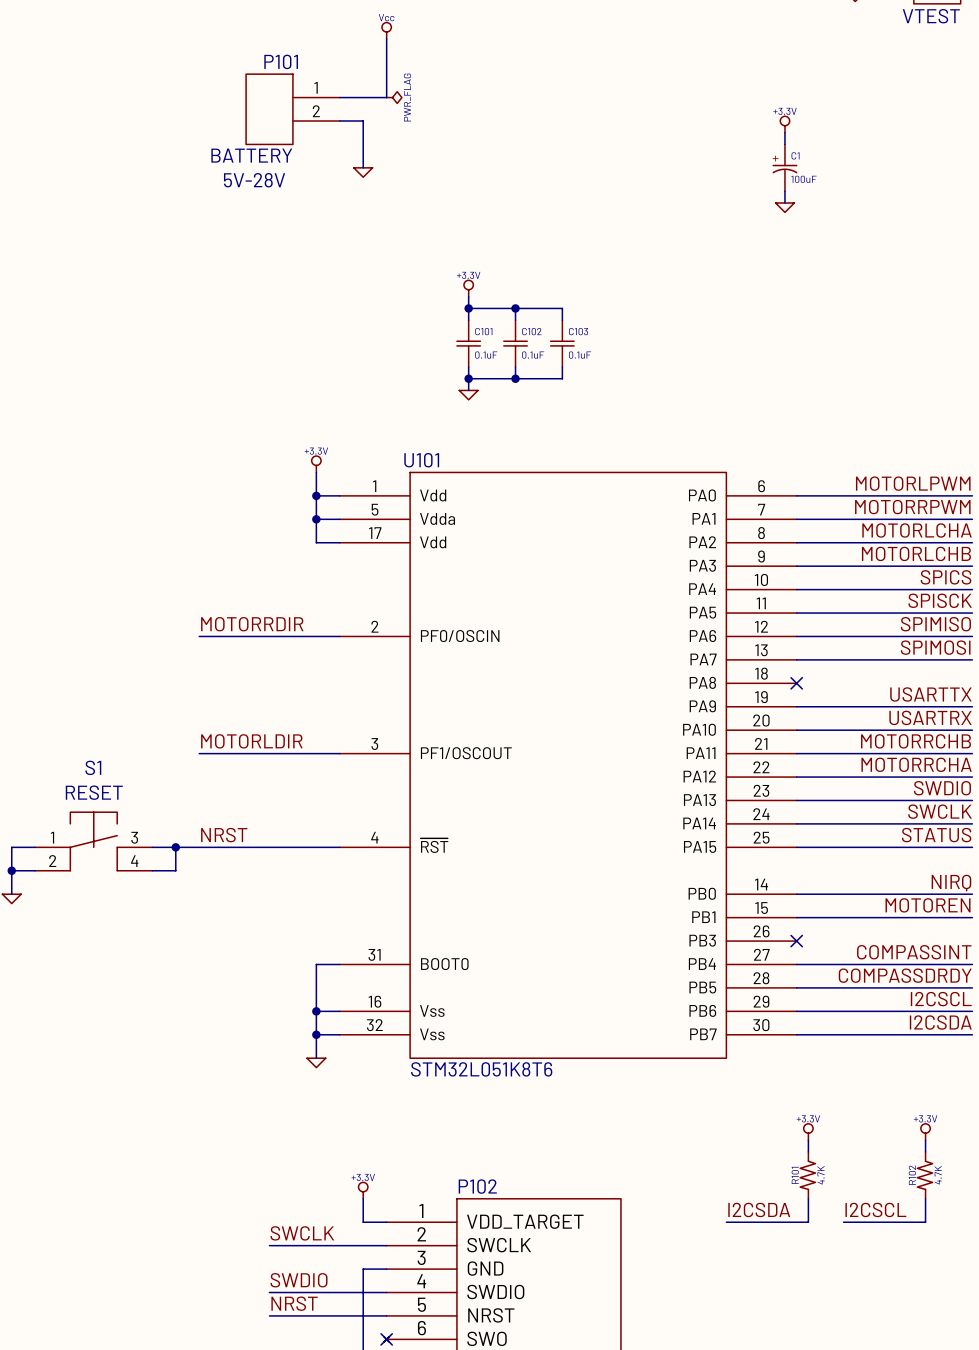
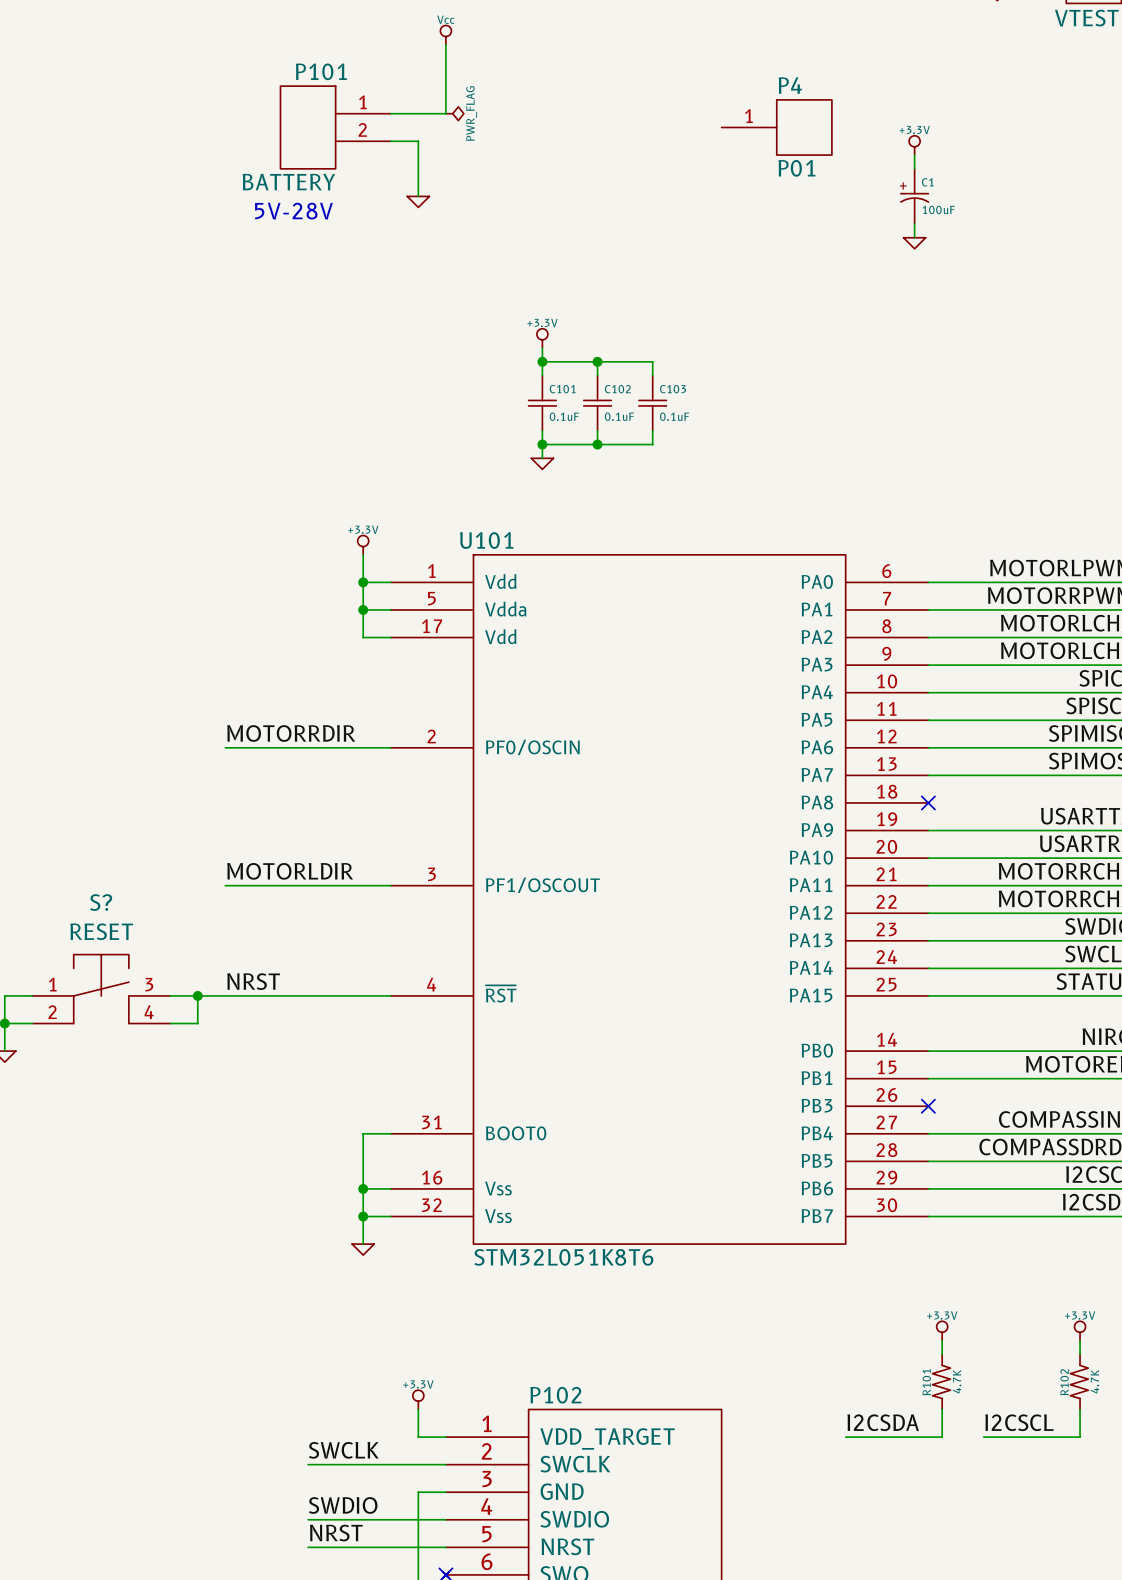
P4: none -> P01 (776, 127)
S1 name: S1 (93, 767) -> S? (101, 902)

